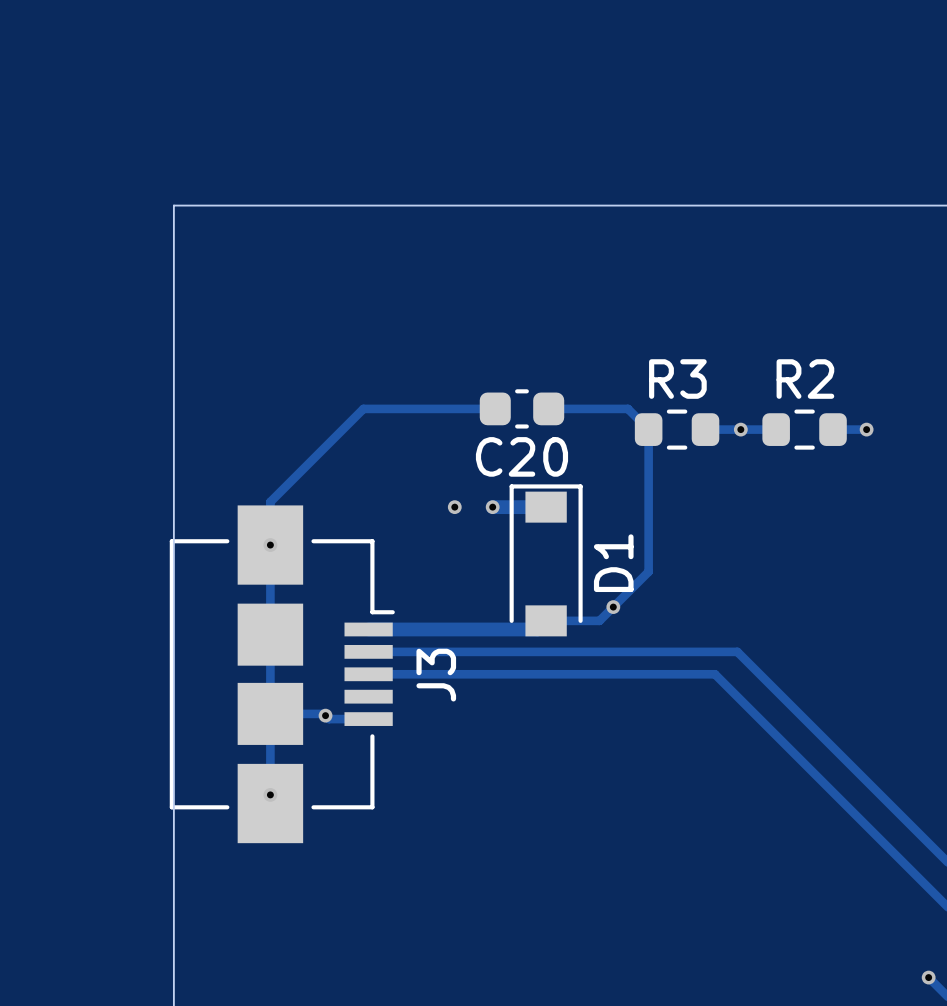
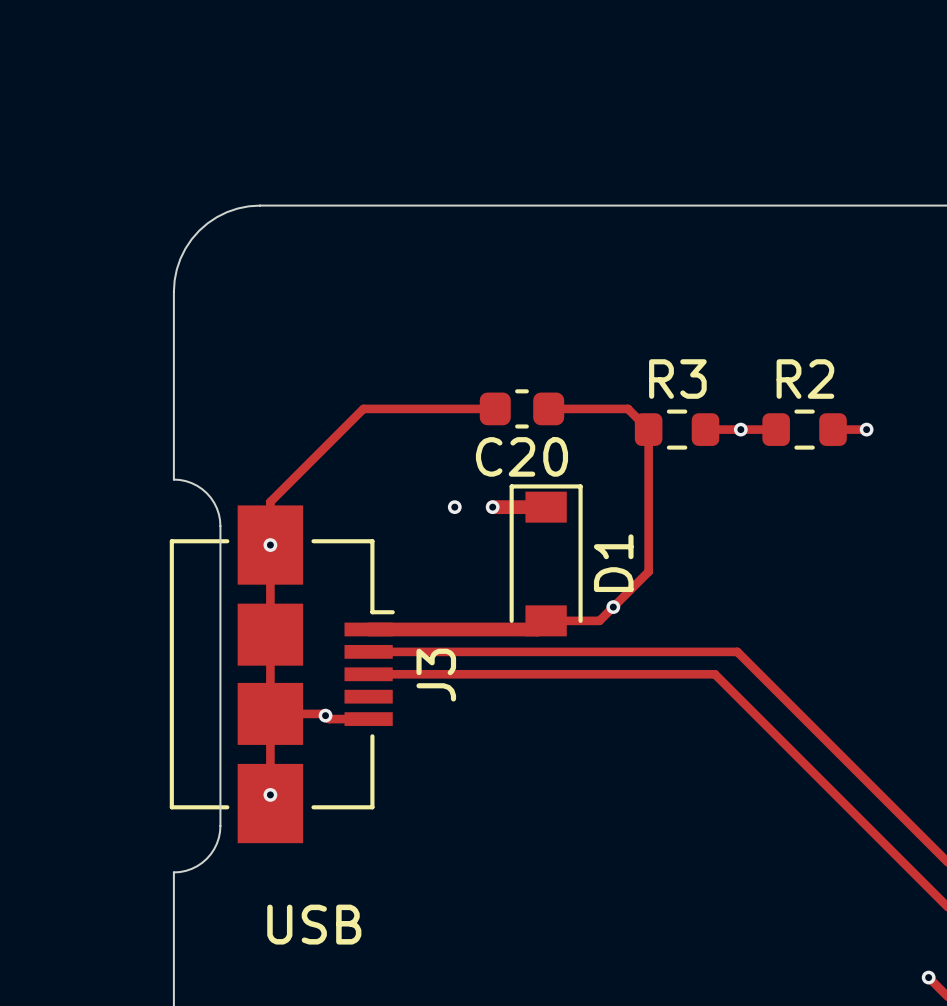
board edge: (260, 205) (173, 205) (173, 291) -> (260, 205) (227, 212) (199, 230) (180, 258) (173, 291)
board edge: (173, 479) (173, 872) -> (173, 479) (191, 483) (206, 493) (216, 508) (220, 526) (220, 831) (216, 843) (206, 858) (191, 868) (173, 872)
text: none -> USB (314, 924)

